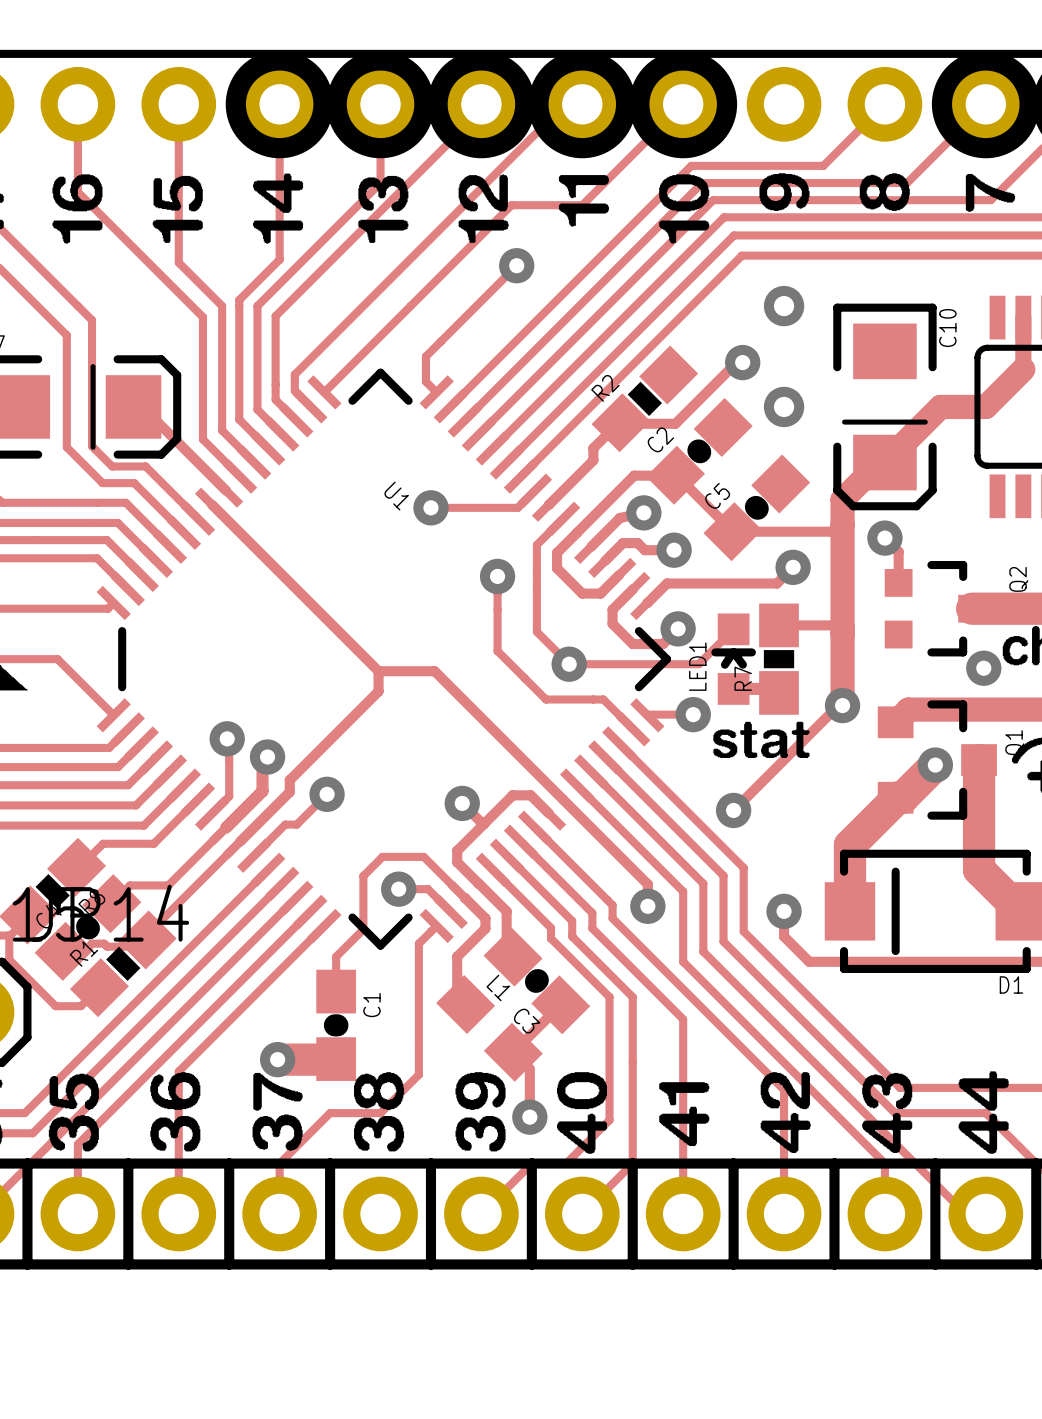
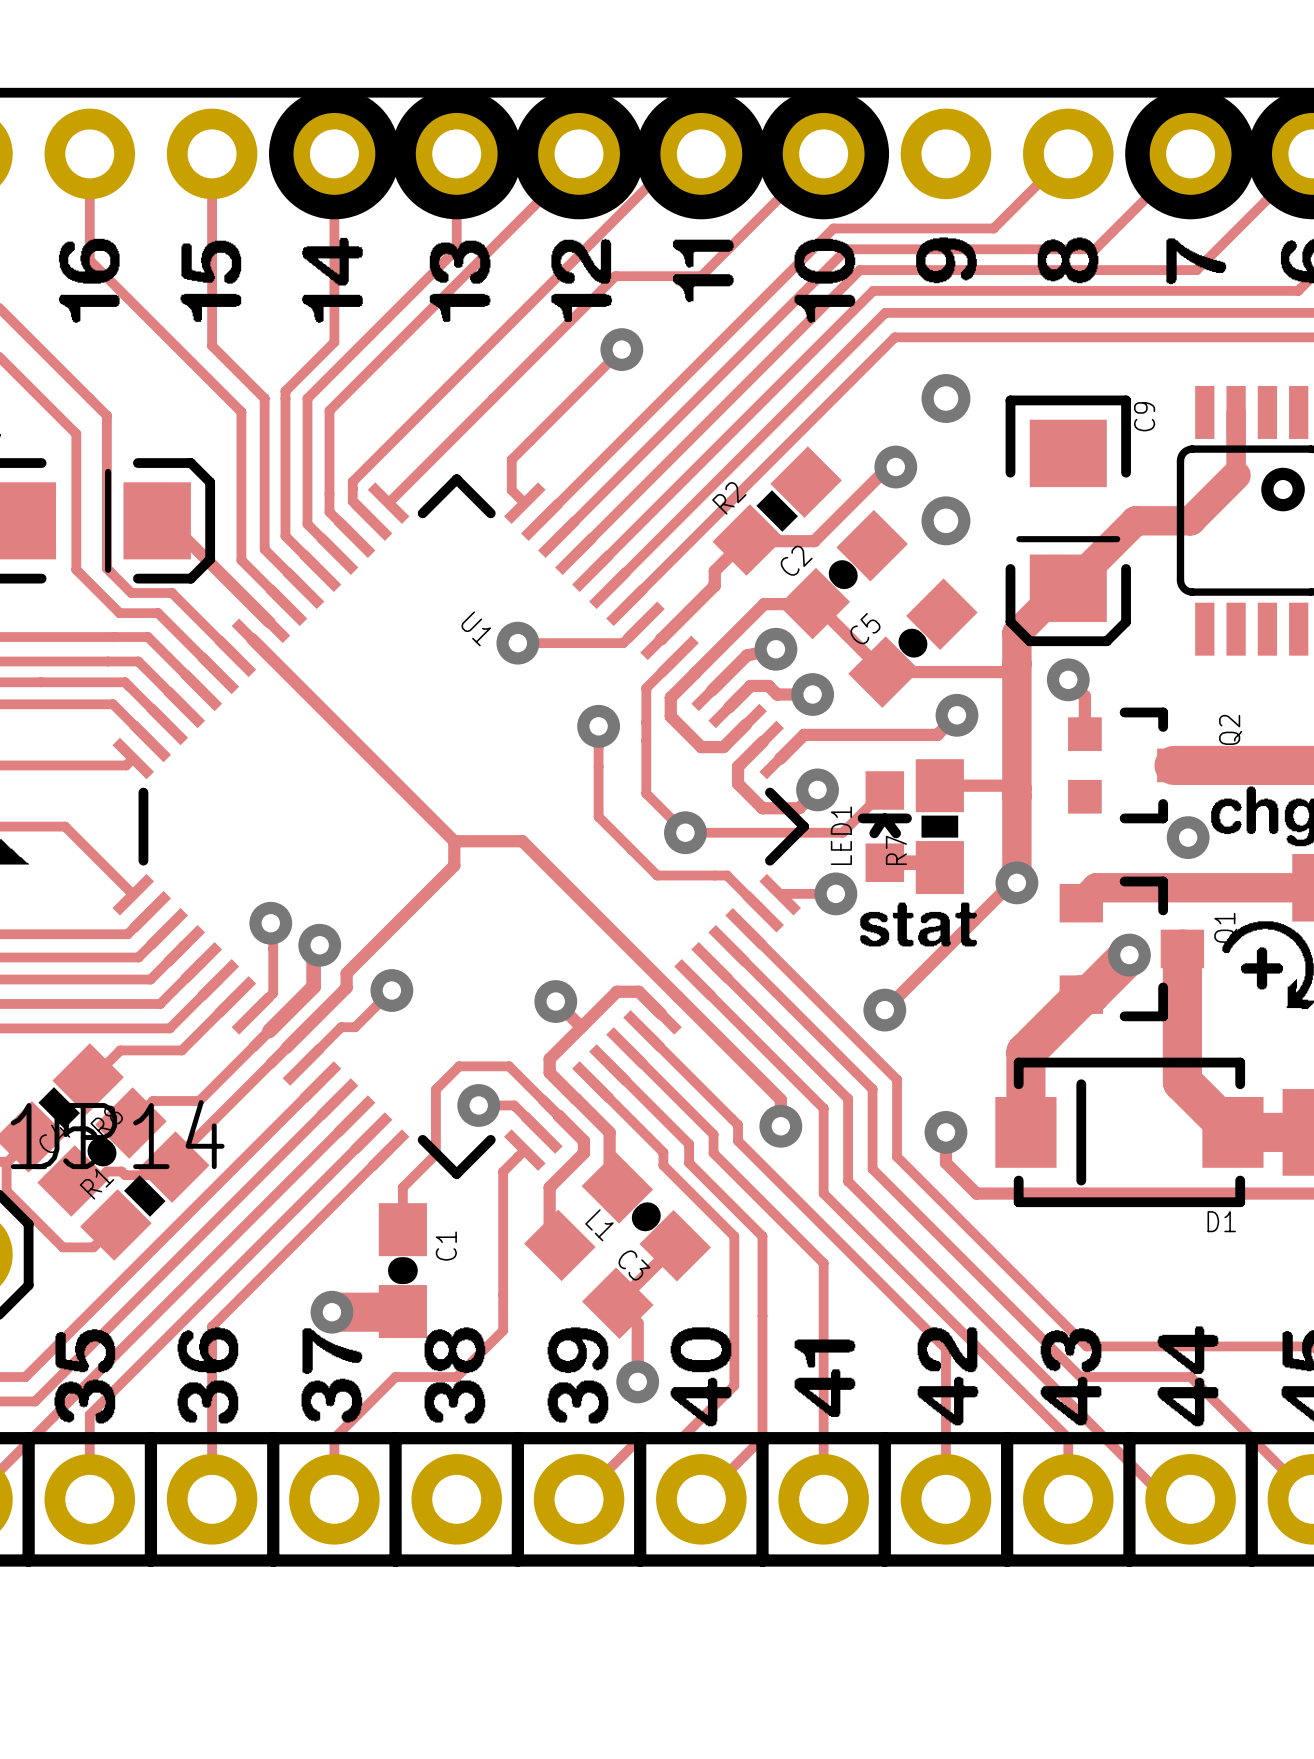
C10 name: C10 (947, 328) -> C9 (1144, 416)

